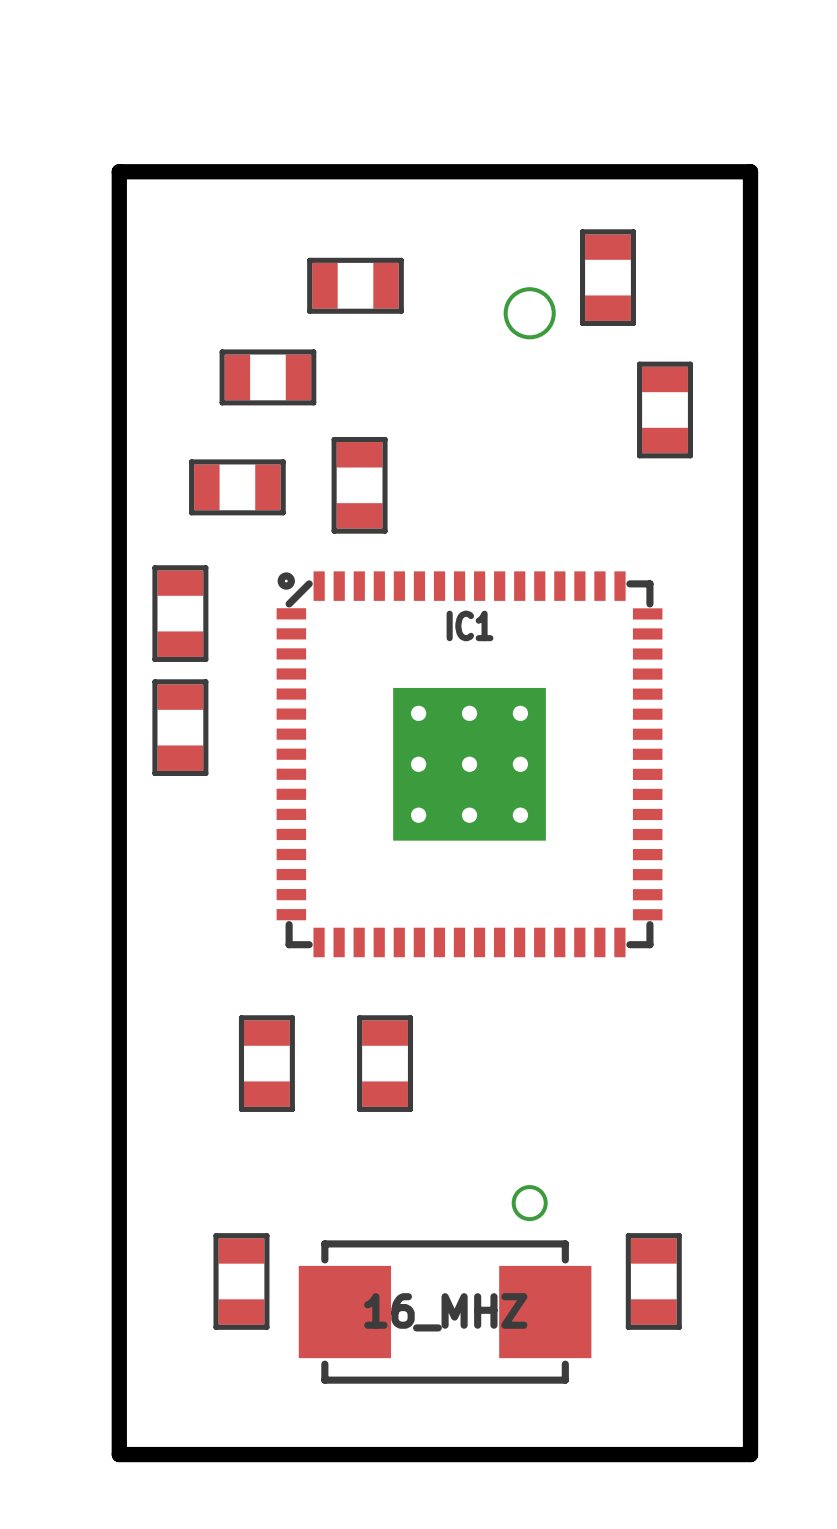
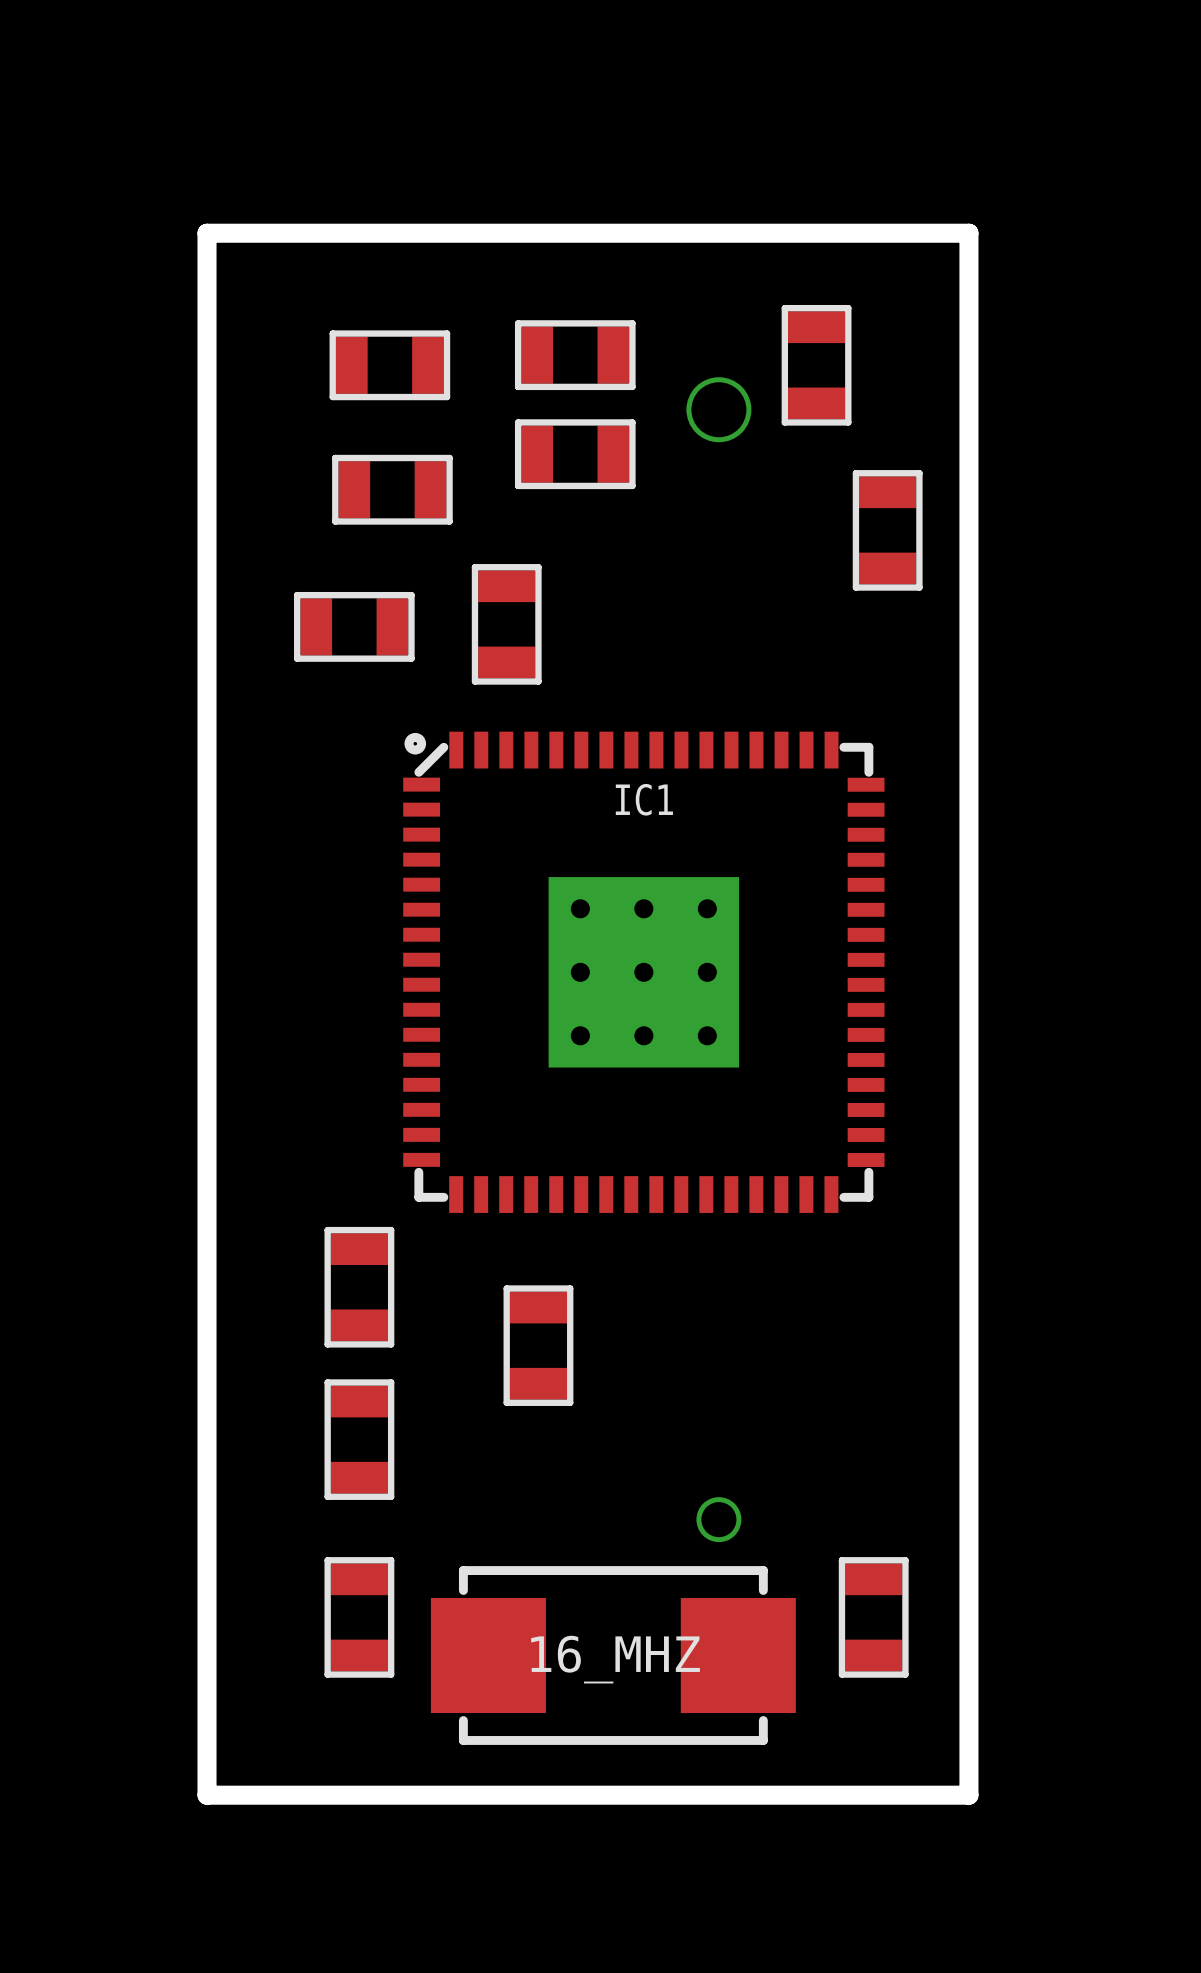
board edge: (730, 171) (750, 171) (750, 1454) (119, 1454) (119, 1424) -> (968, 233) (968, 1795) (207, 1795)
part: none -> (575, 355)
part: none -> (389, 365)
part: (355, 285) -> none
part: none -> (575, 454)
part: (180, 613) -> none
part: (180, 727) -> none
part: none -> (359, 1287)
part: (266, 1063) -> none
part: none -> (359, 1439)

